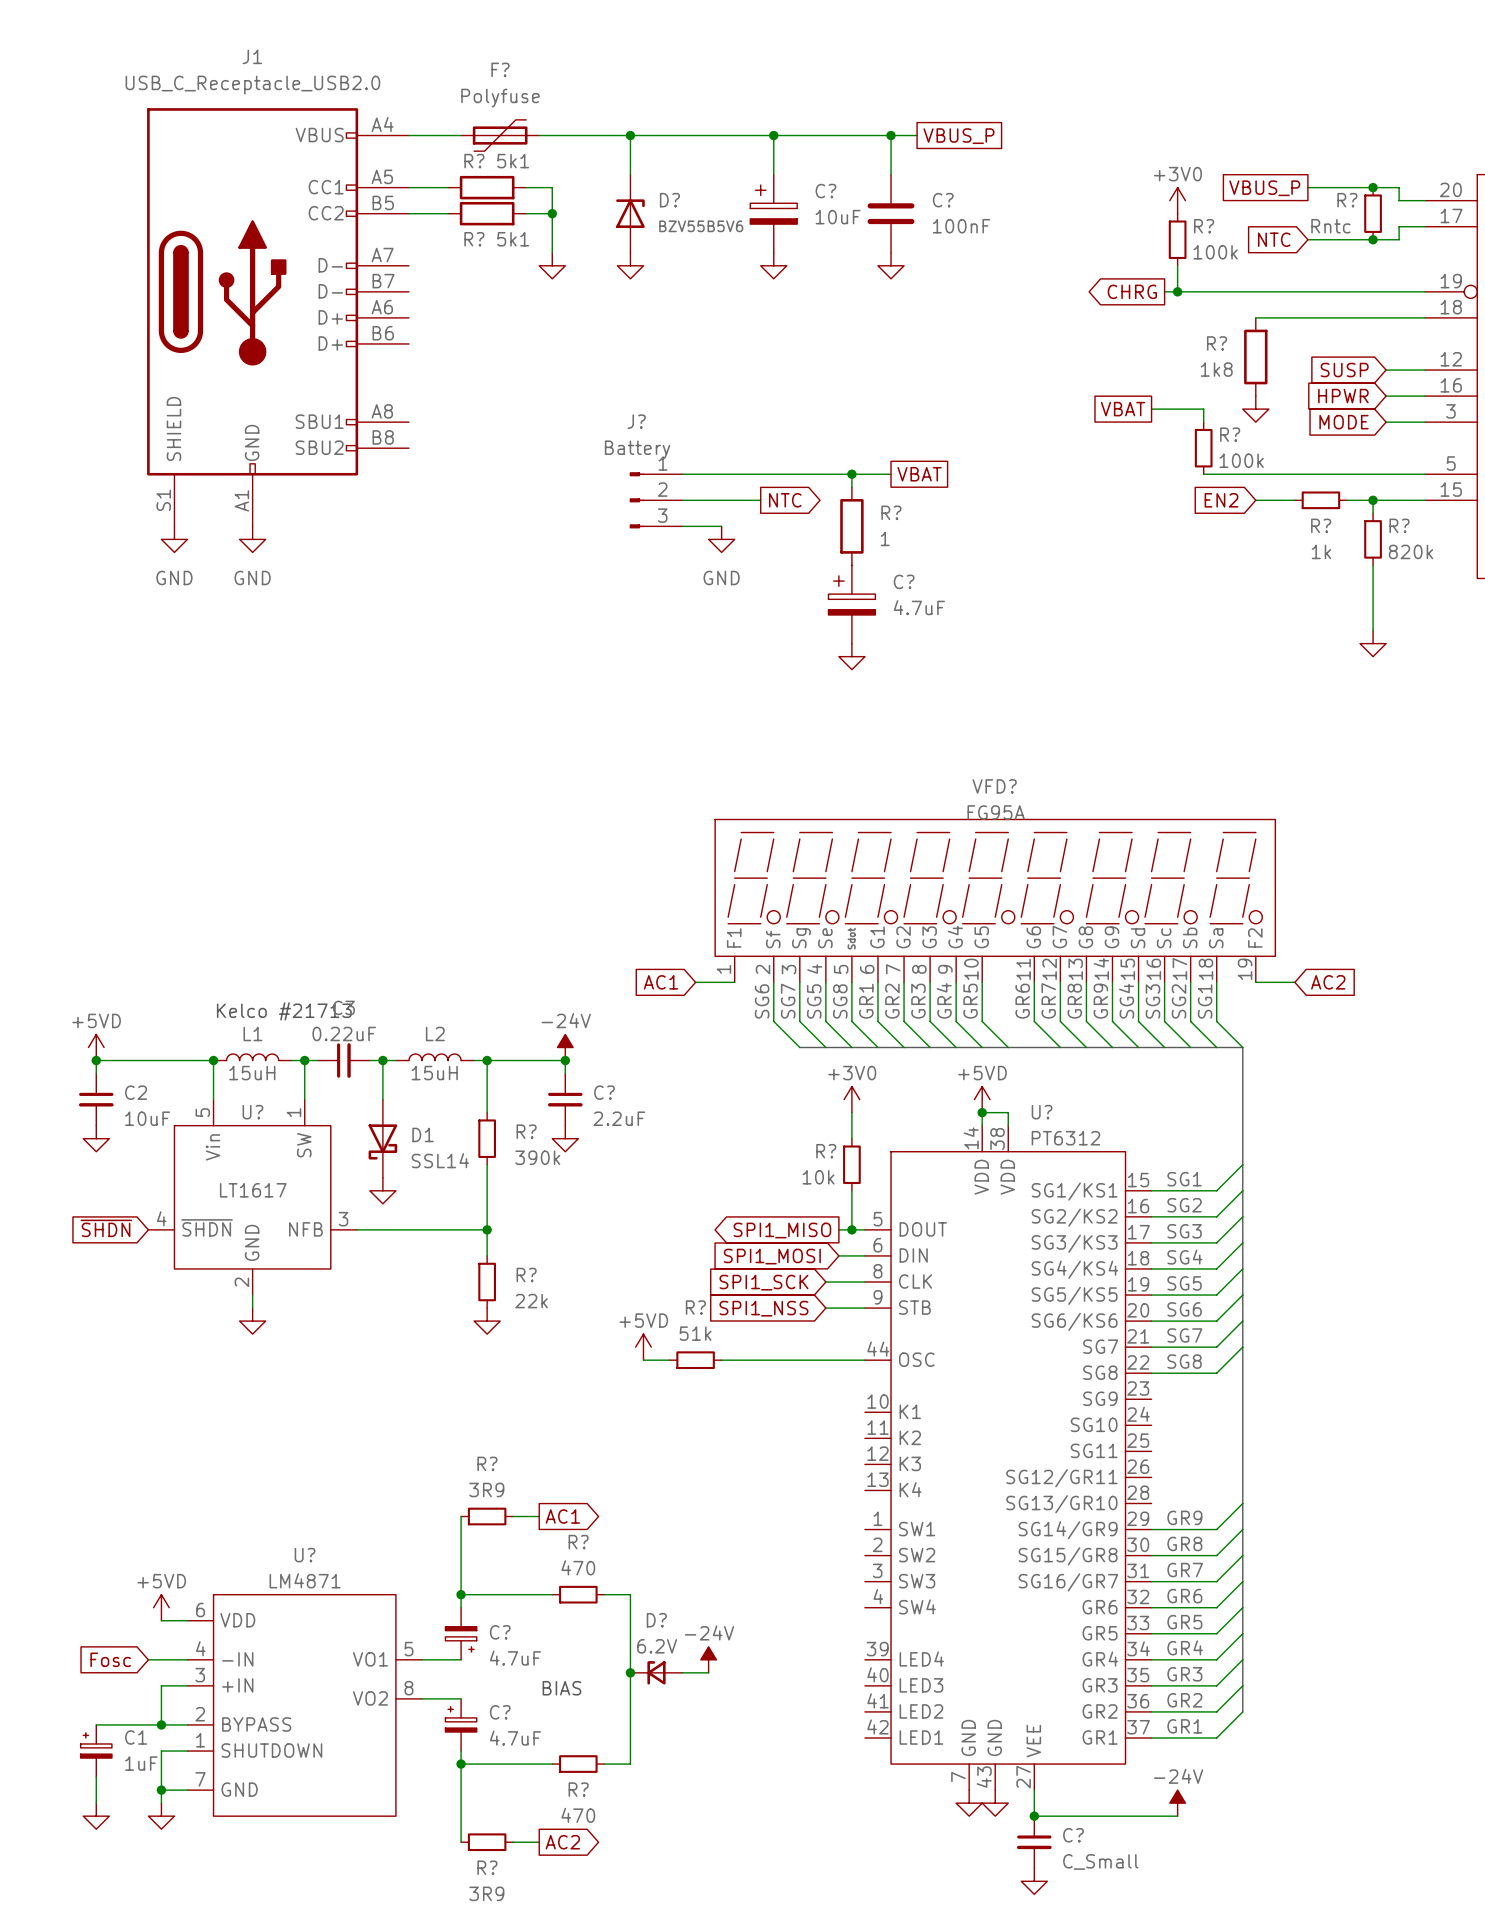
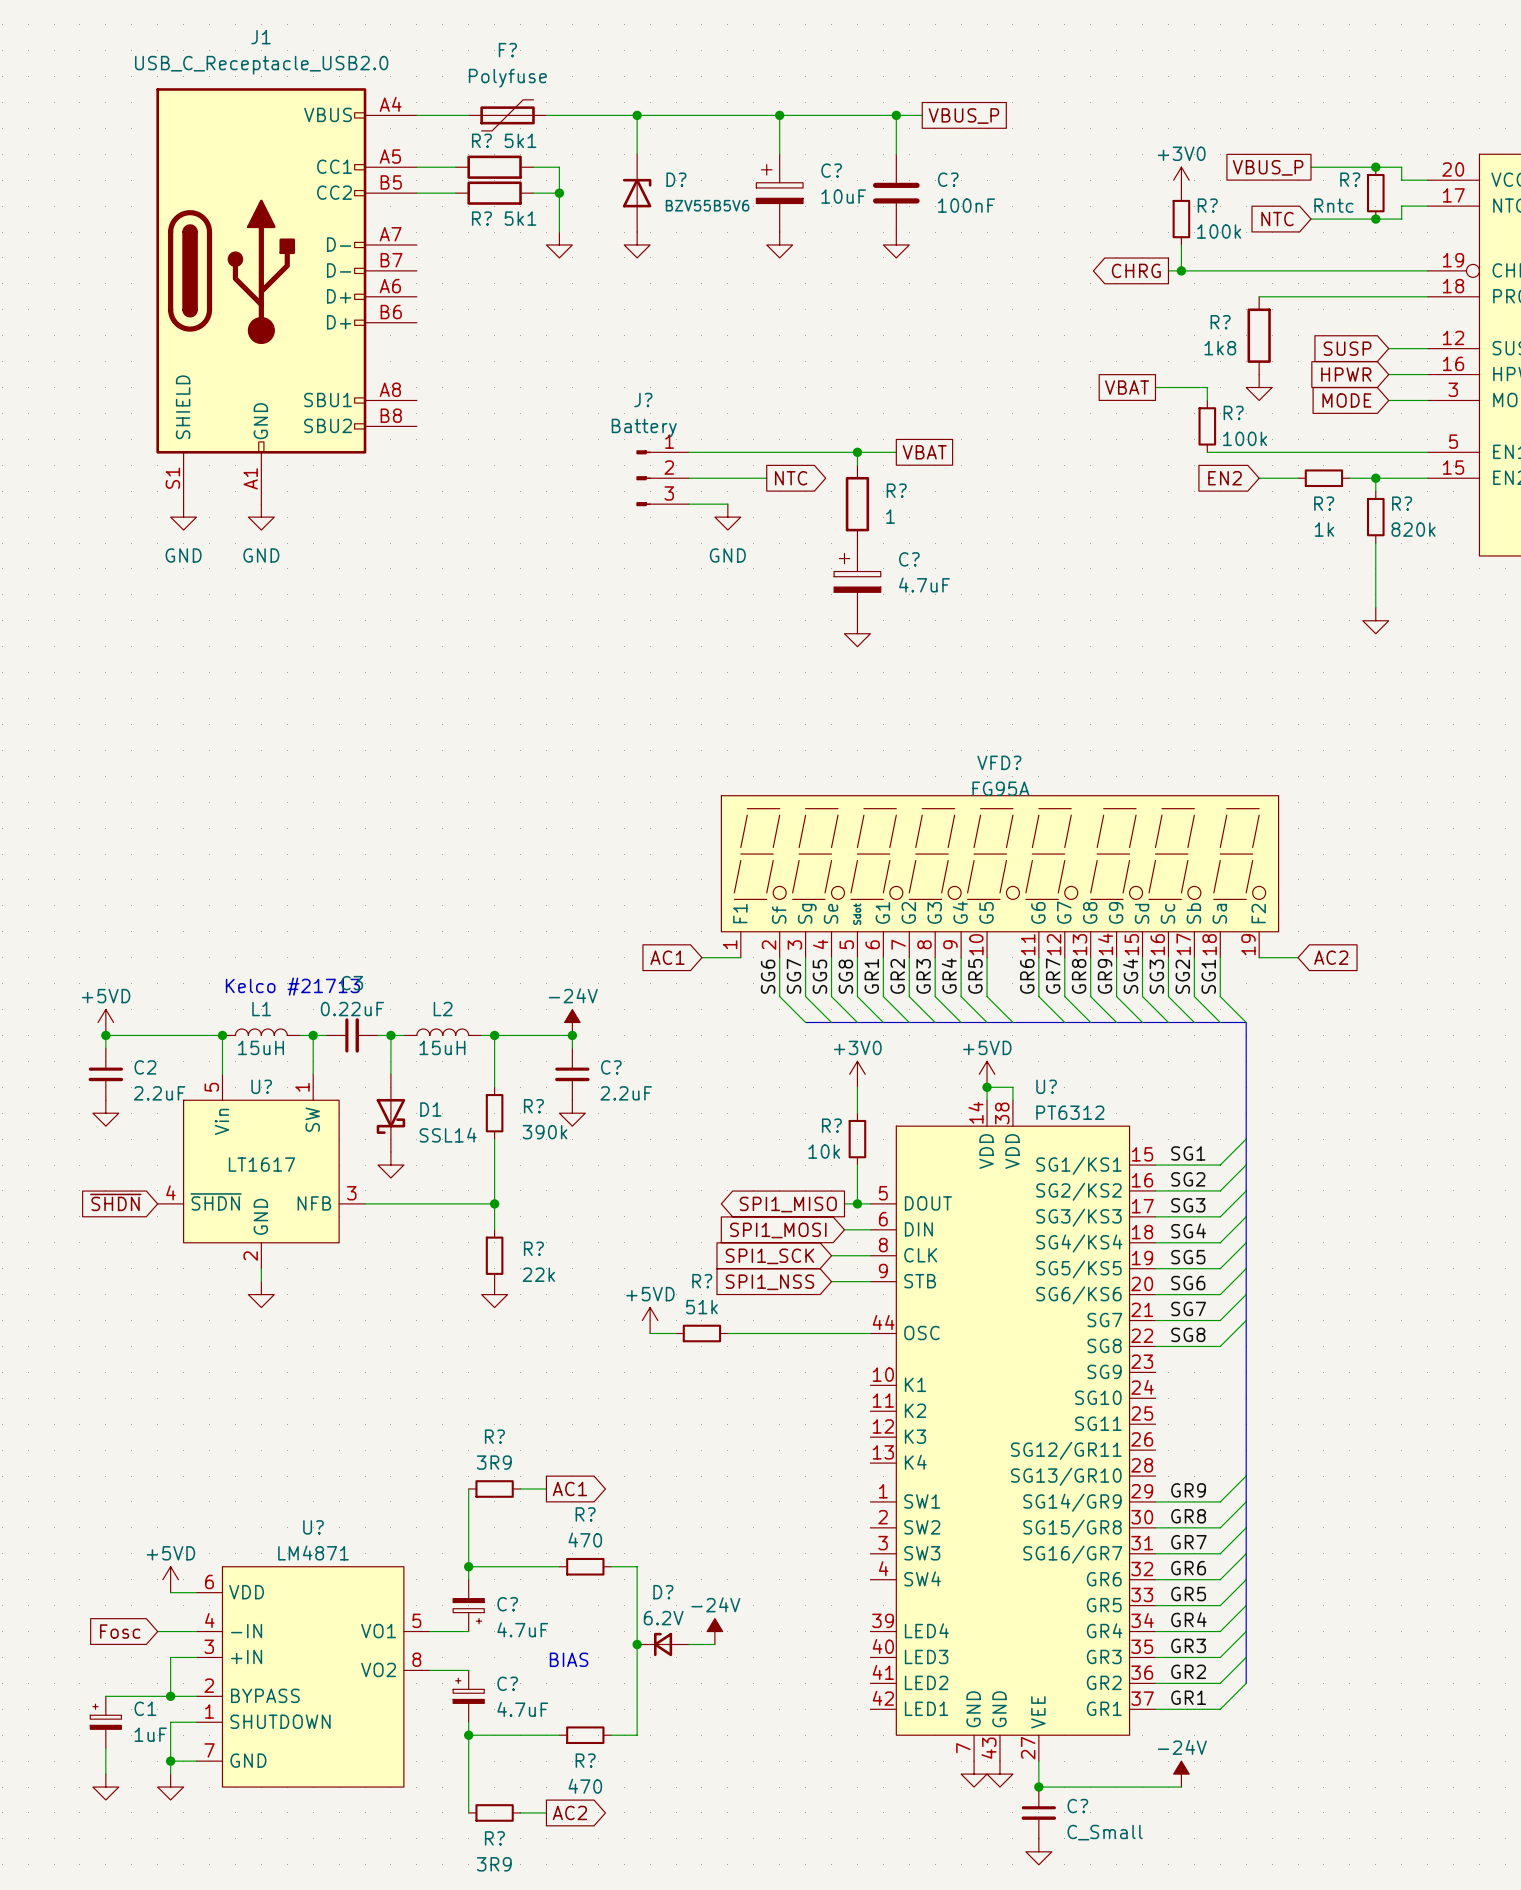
C2 value: 10uF (147, 1118) -> 2.2uF (159, 1093)

